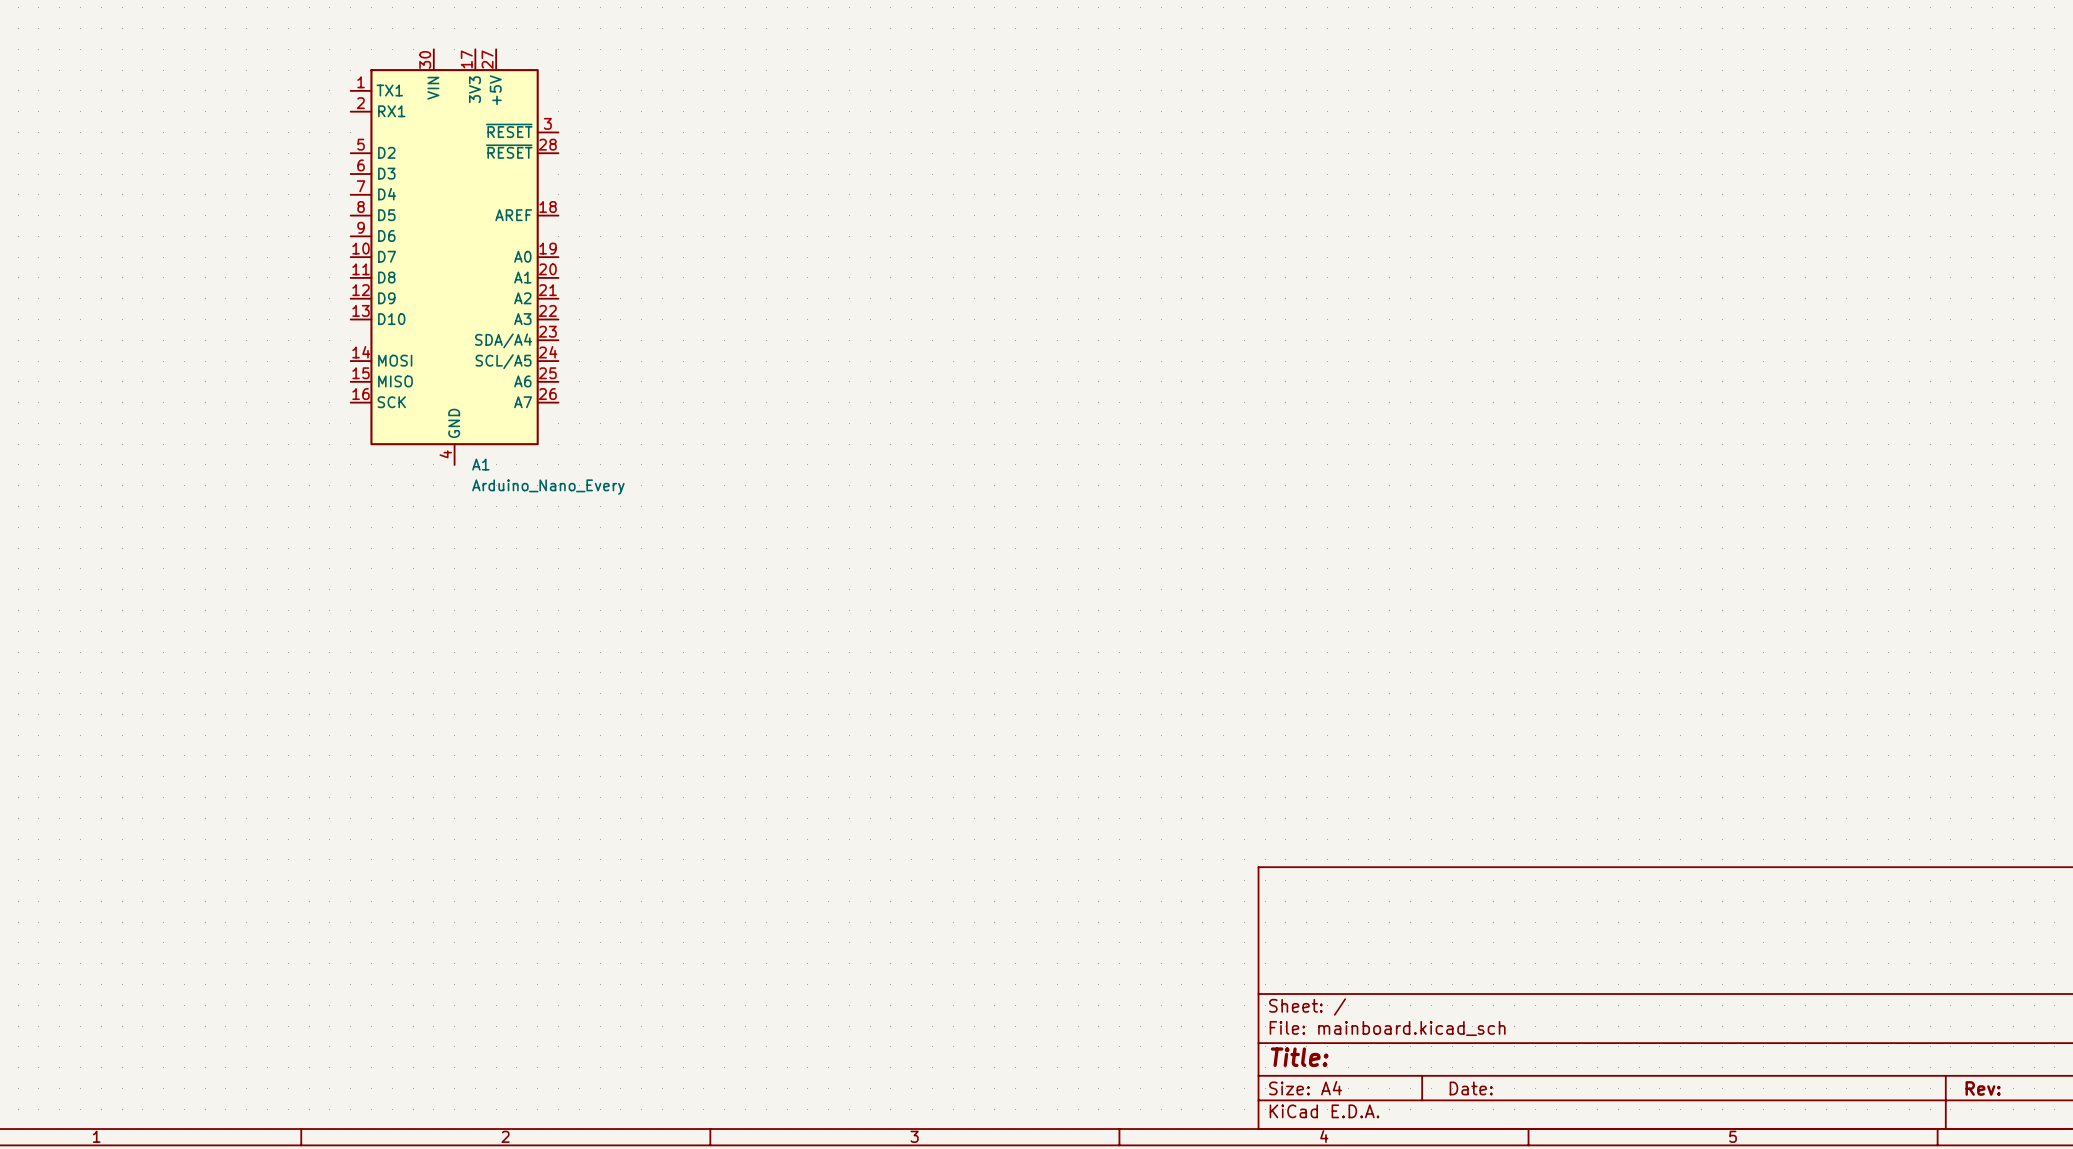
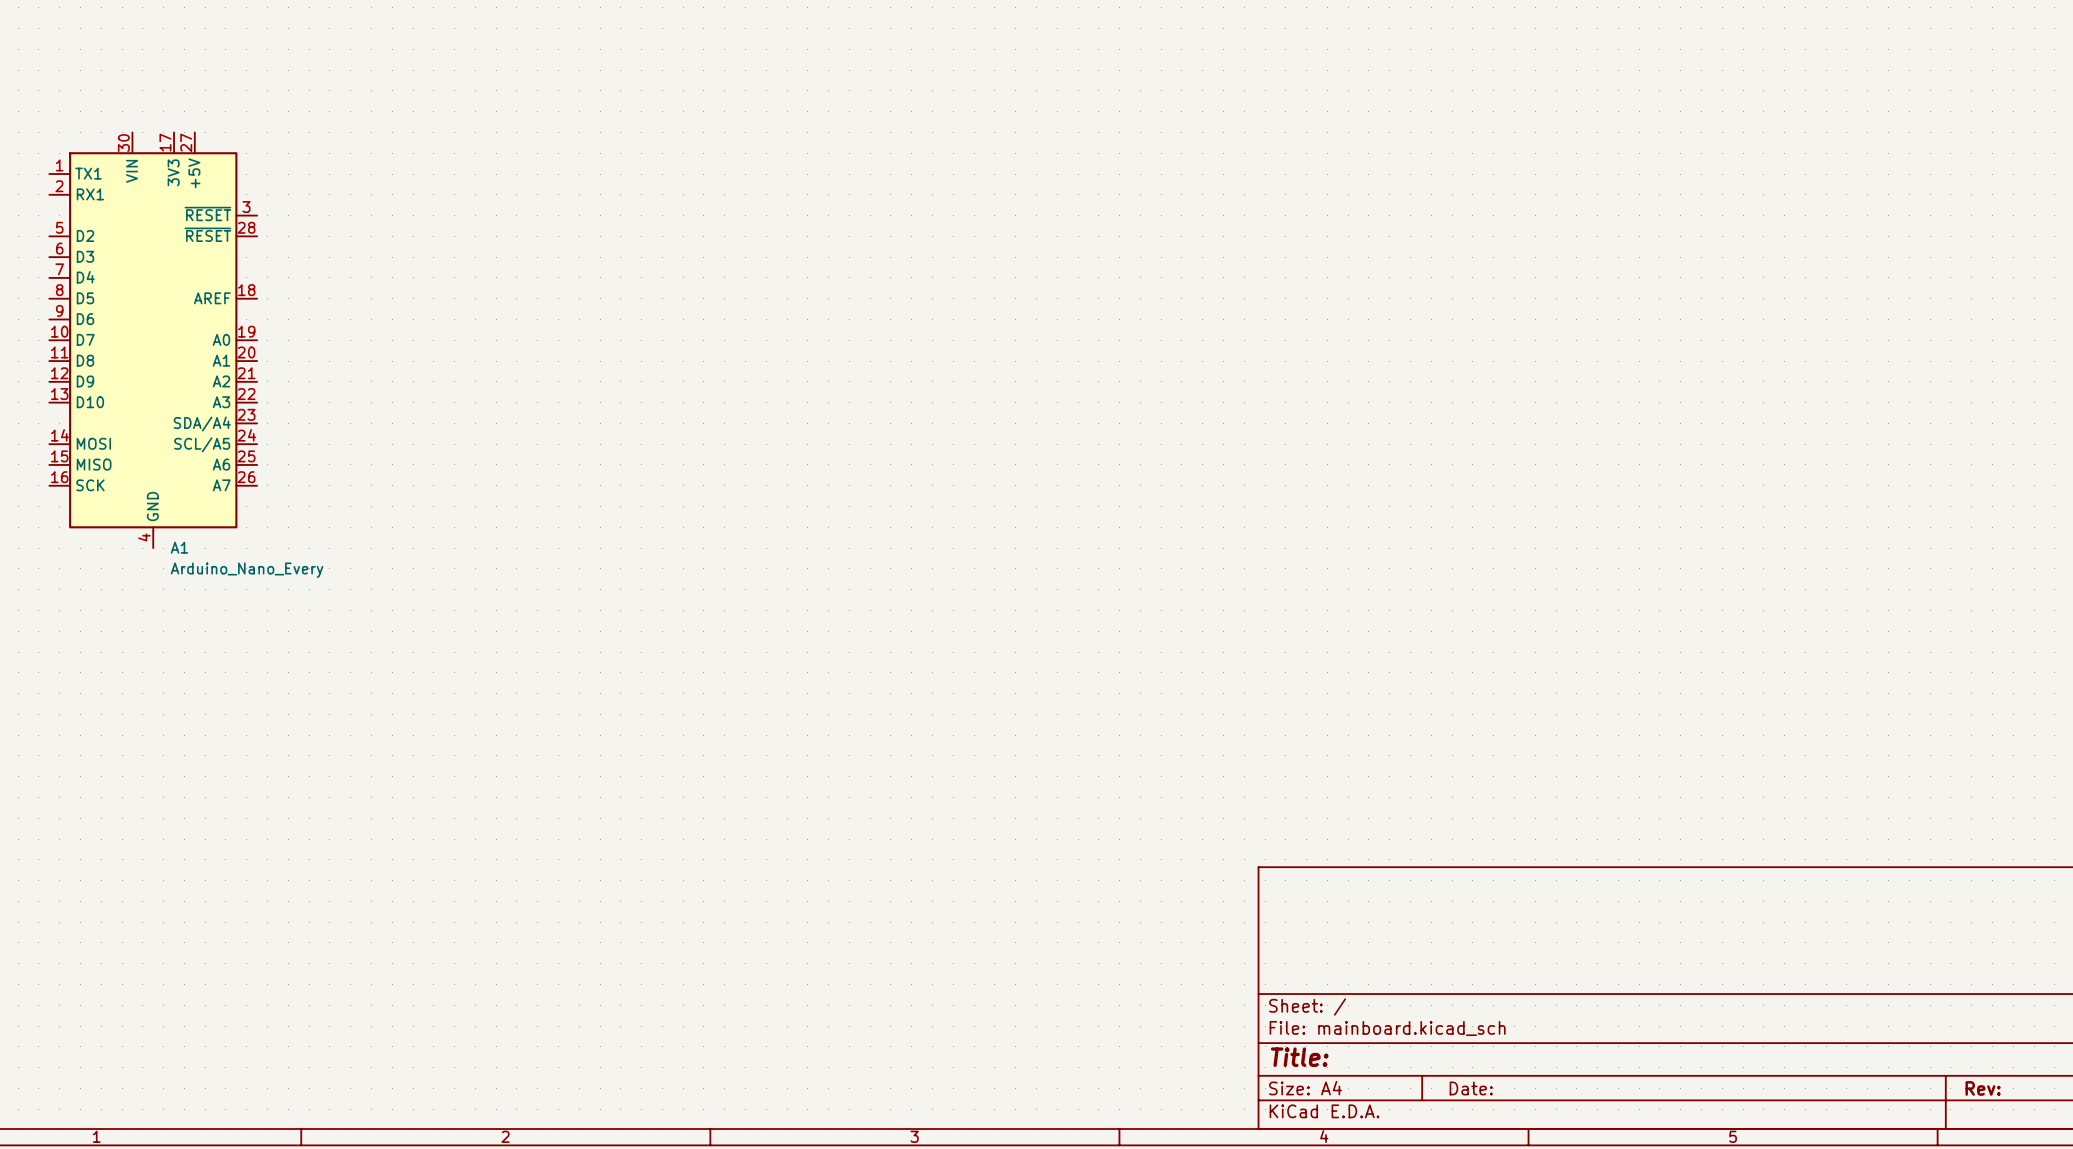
A1 position: (454, 257) -> (153, 340)

